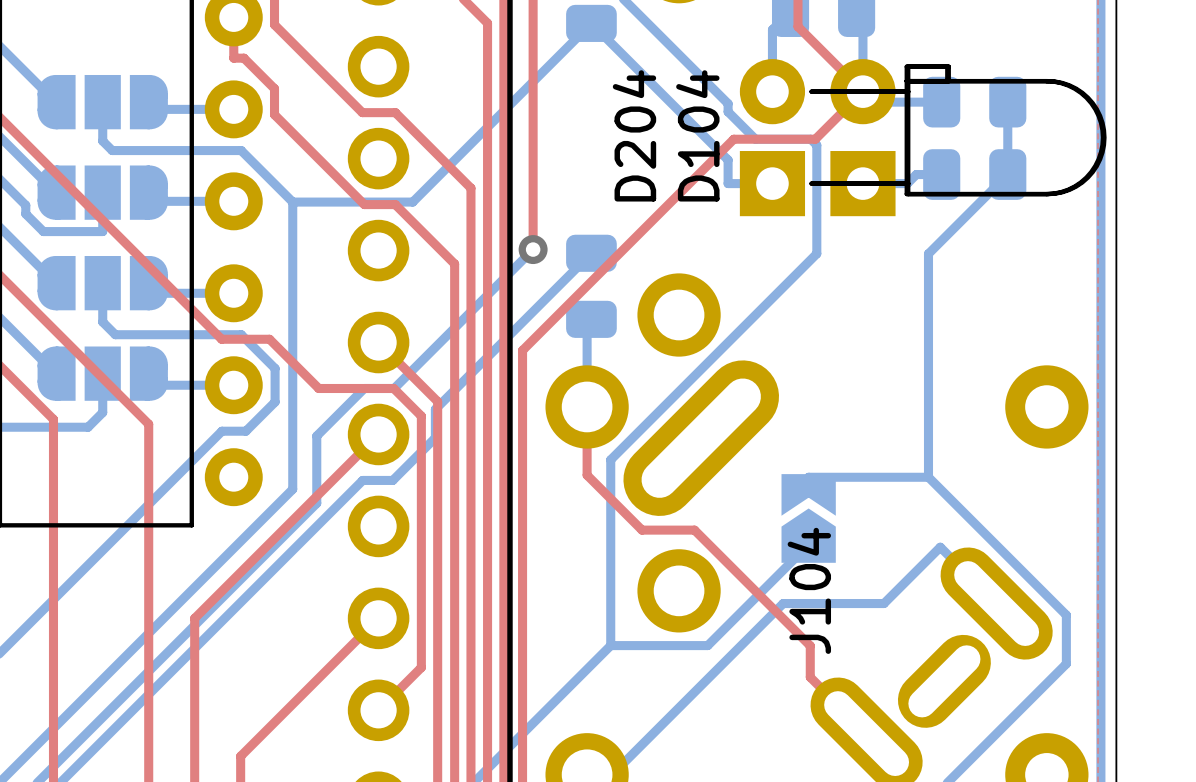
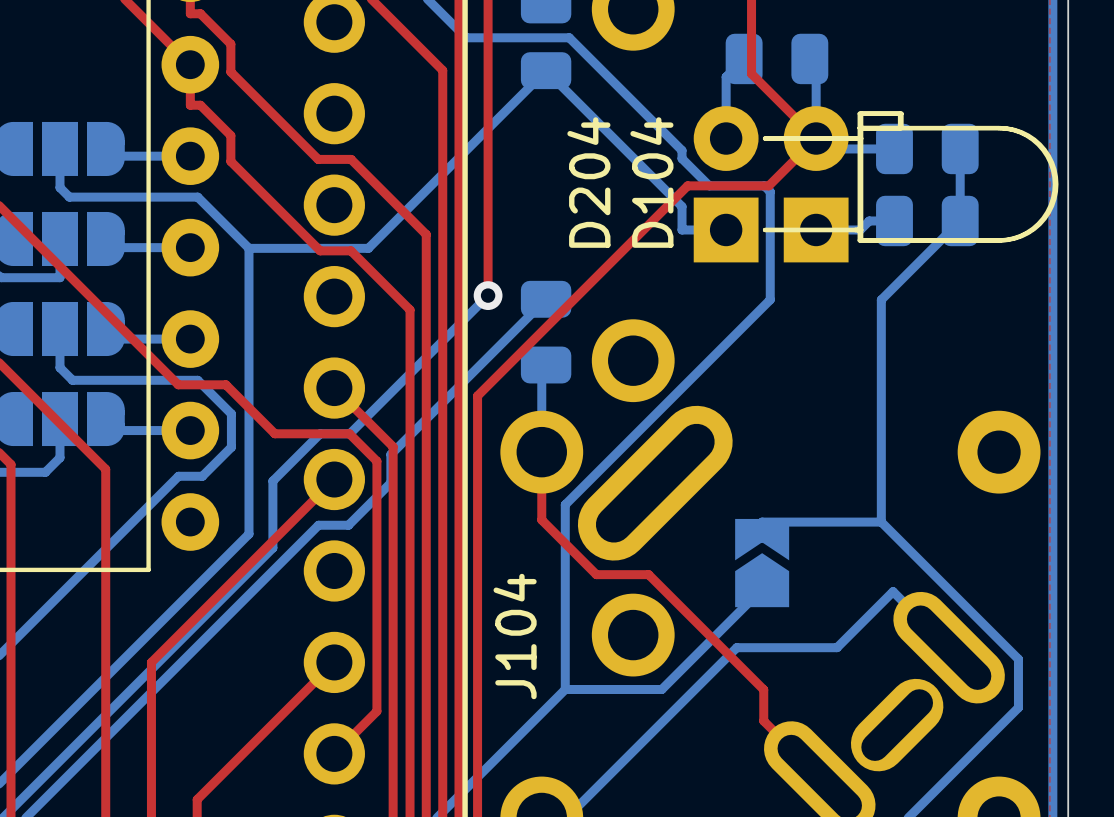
J104 name position: J104 (809, 590) -> J104 (515, 636)

